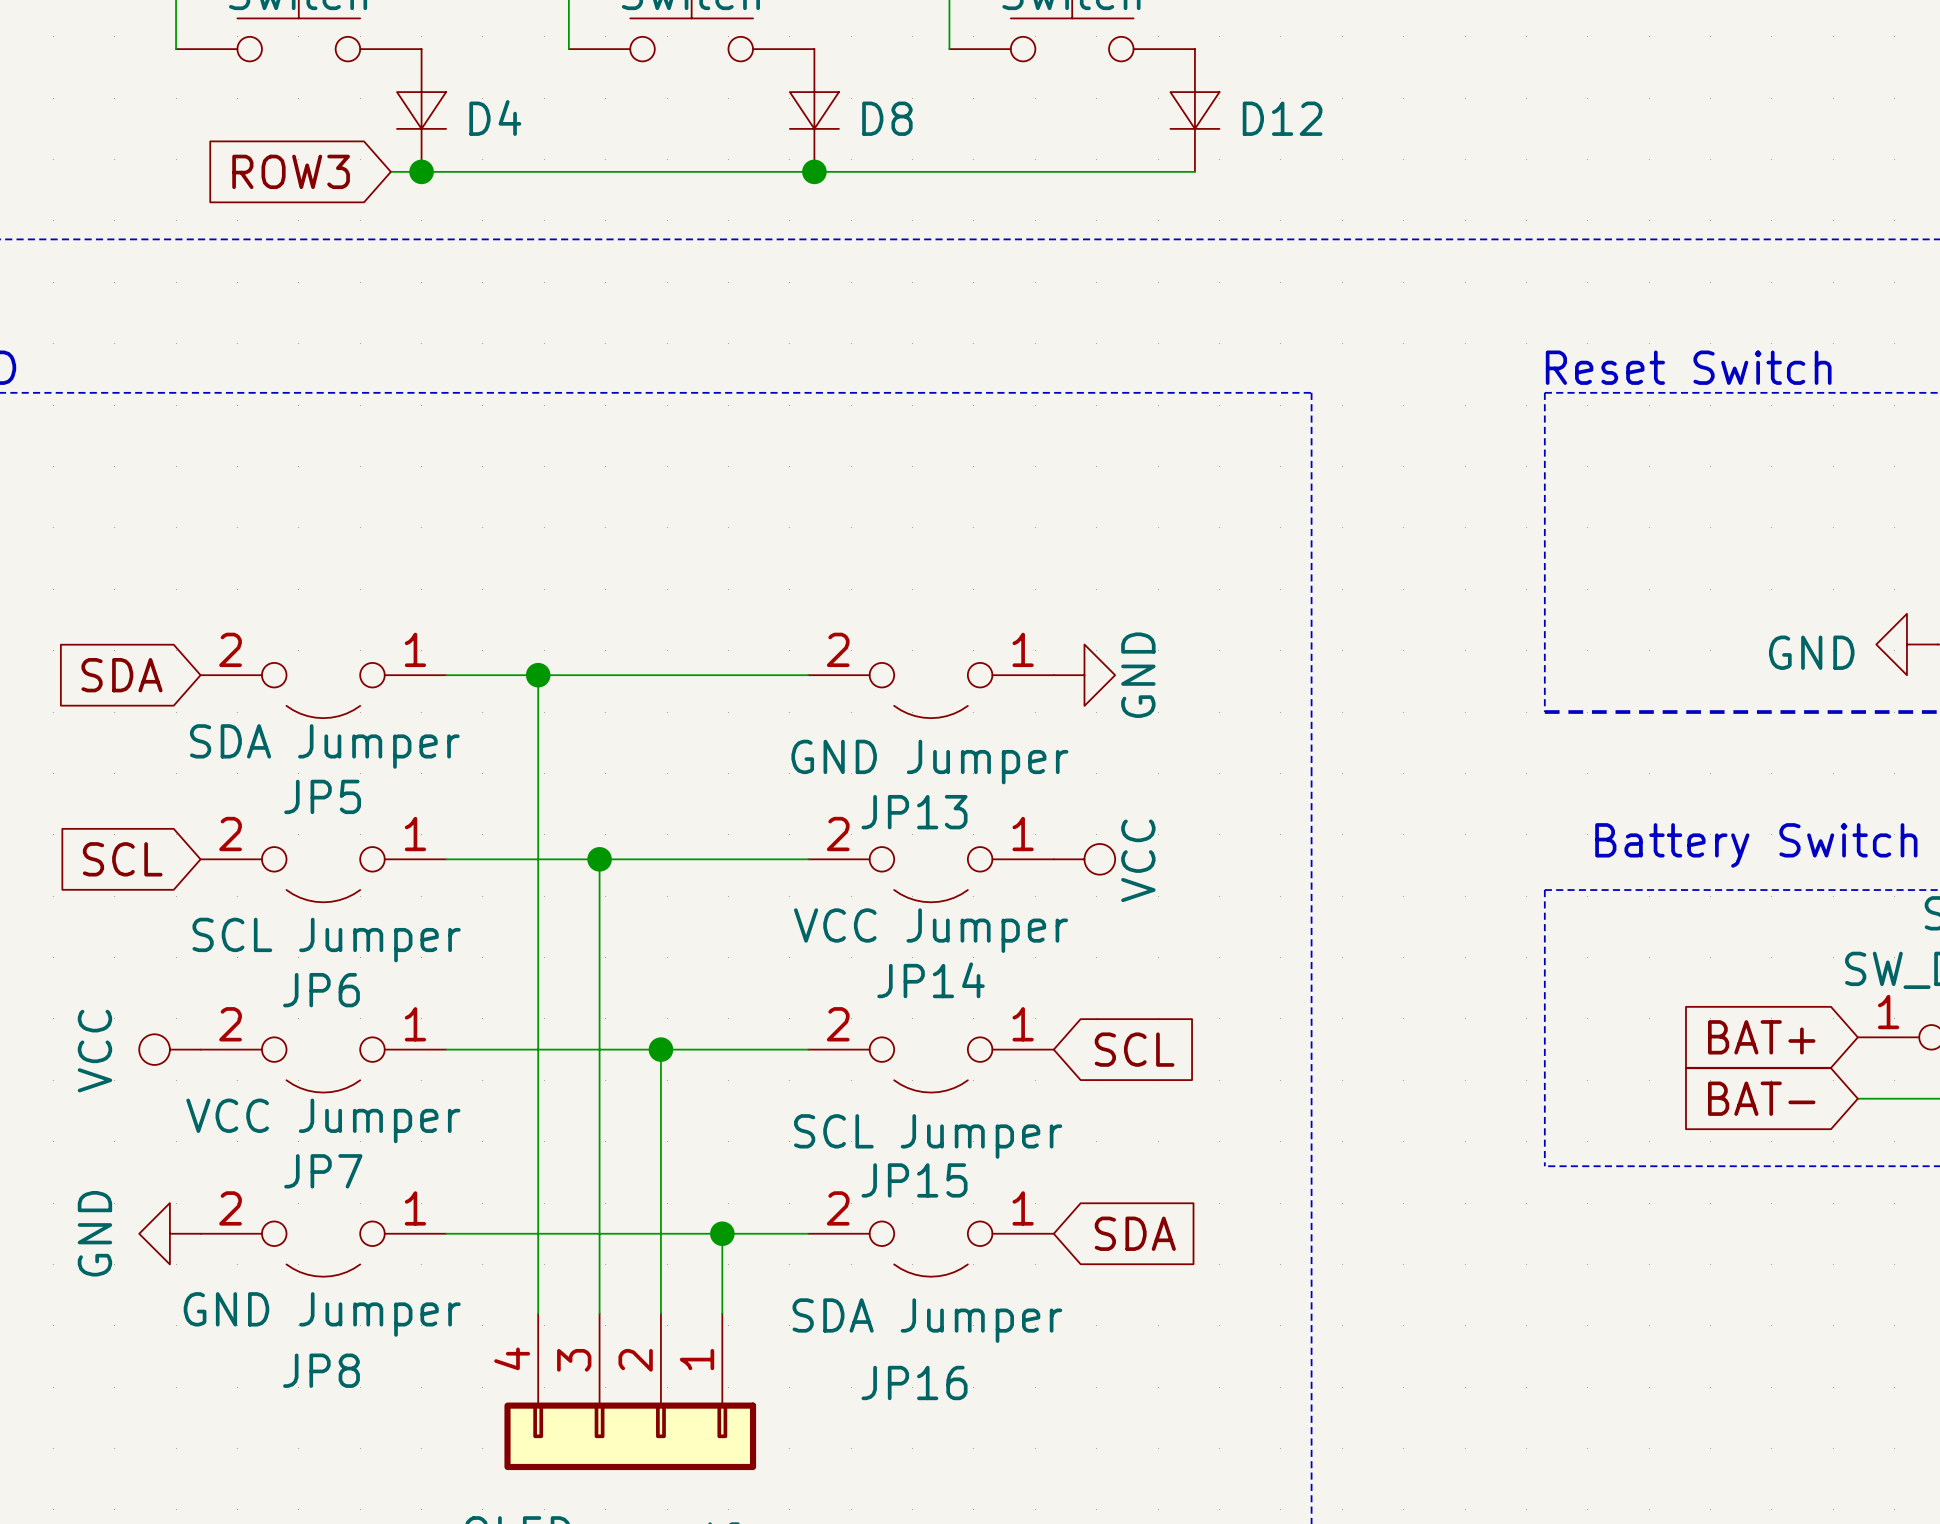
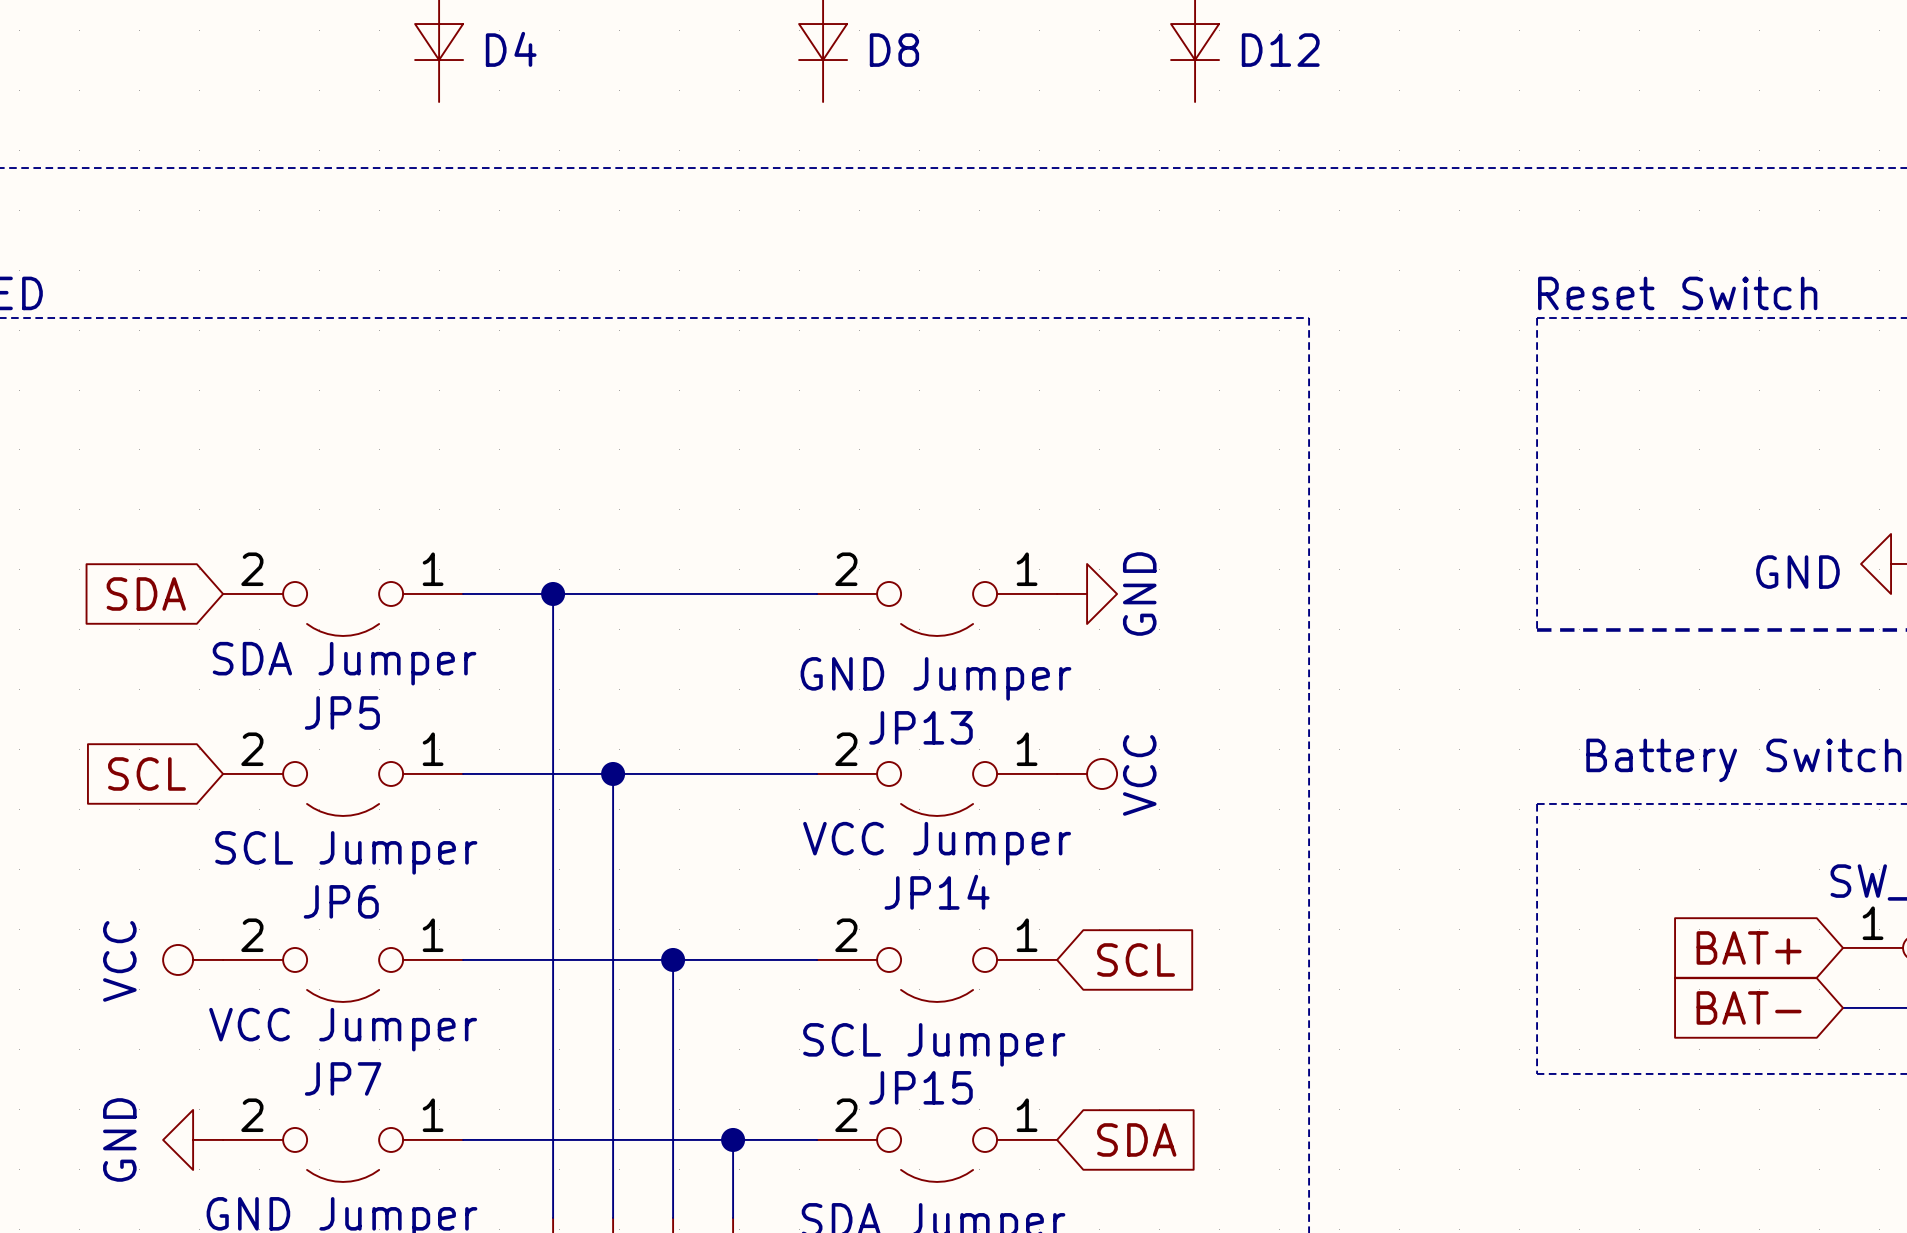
global label: ROW3 (291, 171) -> none
wire: (390, 171) (1194, 171) -> none
junction: (421, 171) -> none
junction: (814, 171) -> none

